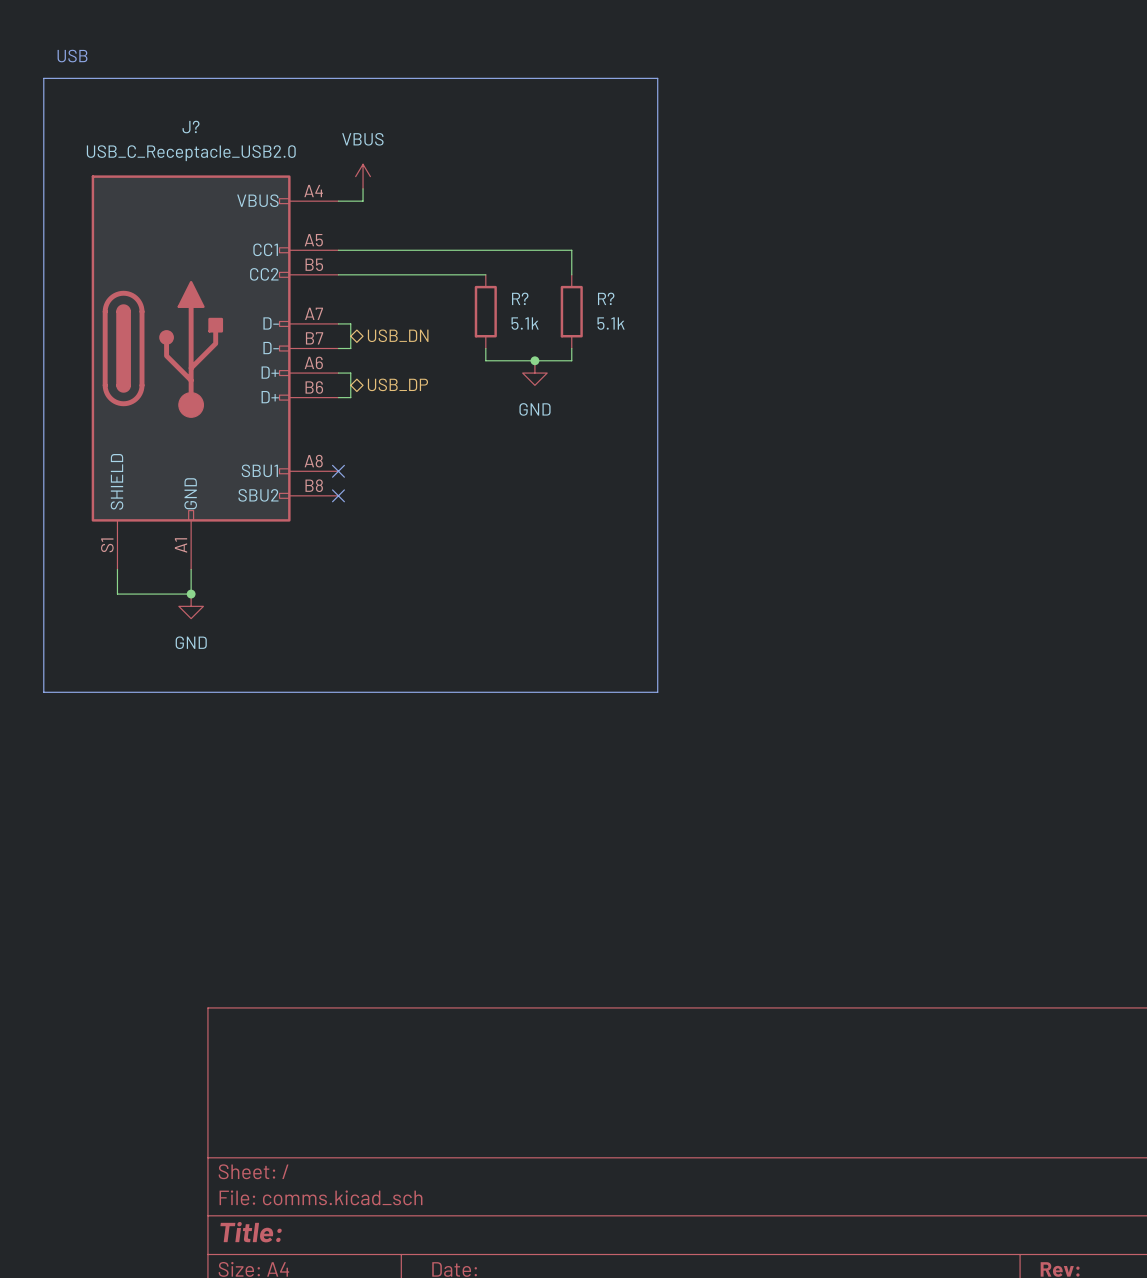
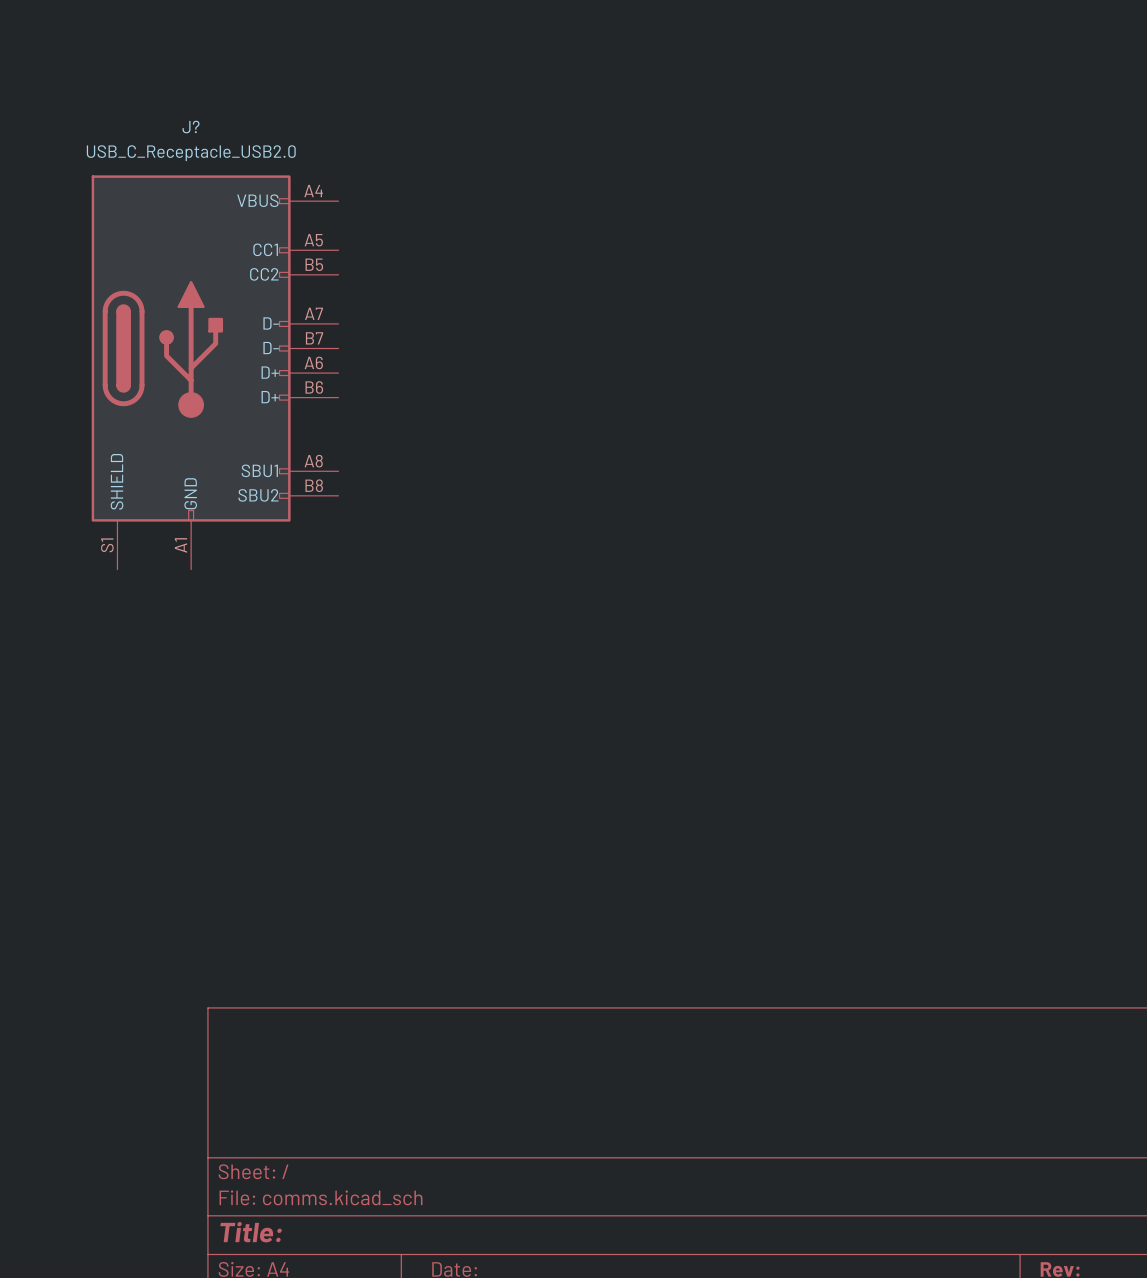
text: USB (72, 56) -> none
line: (43, 78) (657, 78) (657, 692) (43, 692) (43, 78) -> none
power symbol: VBUS (363, 176) -> none
wire: (363, 188) (363, 201) (338, 201) -> none
wire: (338, 250) (571, 250) (571, 274) -> none
wire: (338, 274) (485, 274) -> none
R?: 5.1k (485, 311) -> none
R?: 5.1k (571, 311) -> none
wire: (338, 323) (350, 323) (350, 348) (338, 348) -> none
hierarchical label: USB_DN (398, 335) -> none
wire: (485, 348) (485, 360) (571, 360) (571, 348) -> none
junction: (534, 360) -> none
wire: (338, 373) (350, 373) (350, 397) (338, 397) -> none
power symbol: GND (534, 373) -> none
hierarchical label: USB_DP (397, 384) -> none
no-connect mark: (338, 471) -> none
no-connect mark: (338, 495) -> none
wire: (117, 569) (117, 594) (191, 594) (191, 569) -> none
junction: (191, 594) -> none
power symbol: GND (191, 606) -> none

